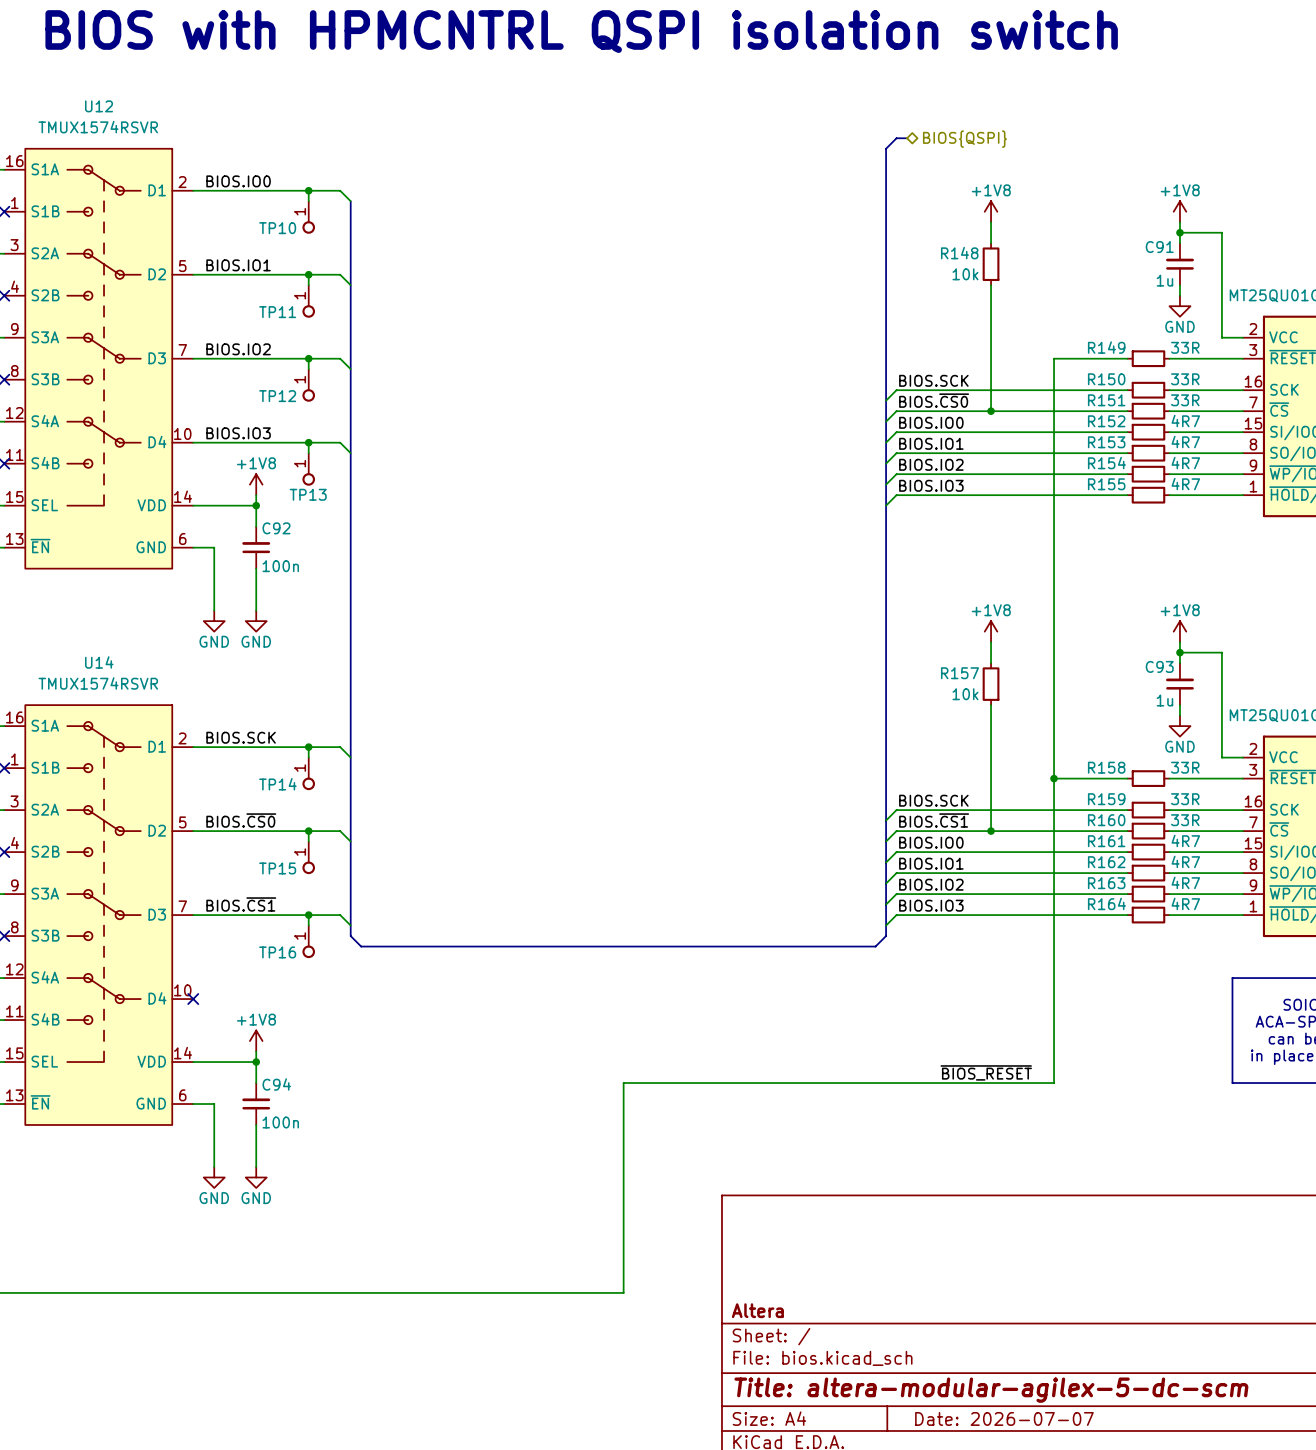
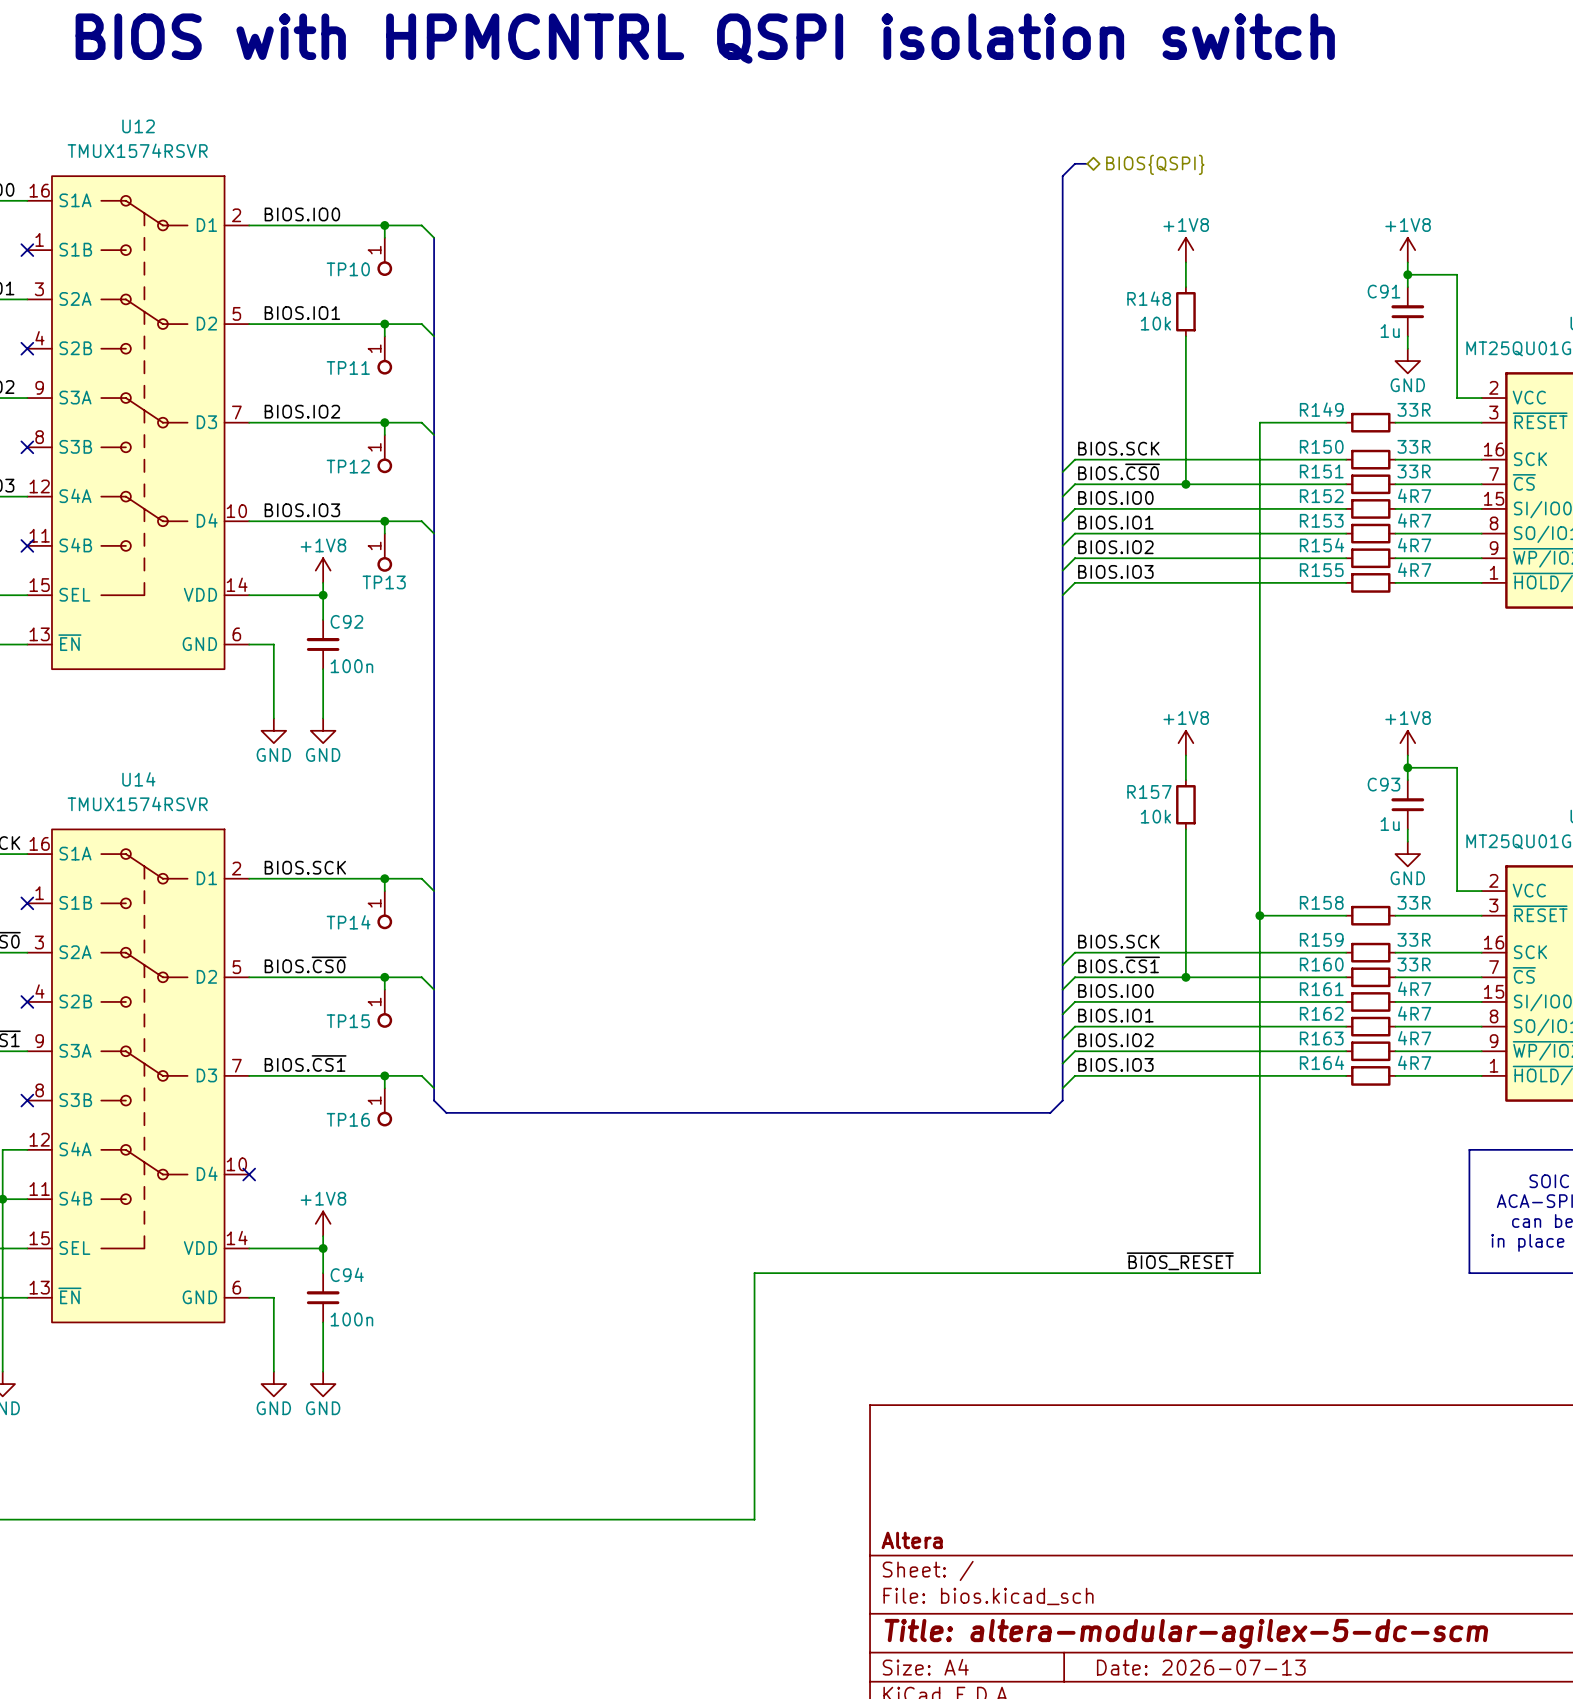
title block: Date: 2026-07-07 (1004, 1418) -> Date: 2026-07-13 (1201, 1667)

